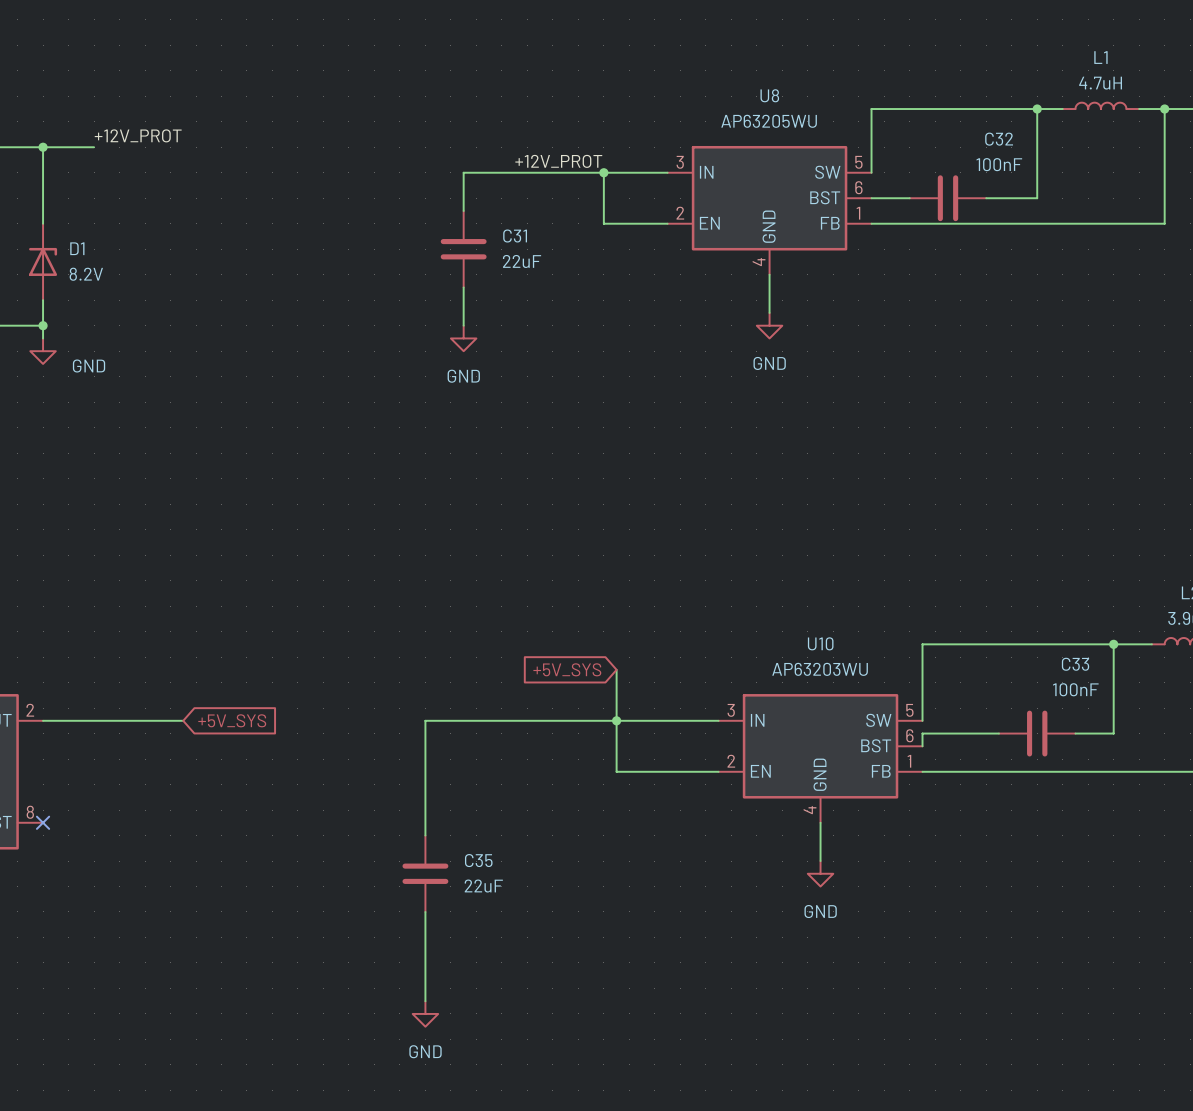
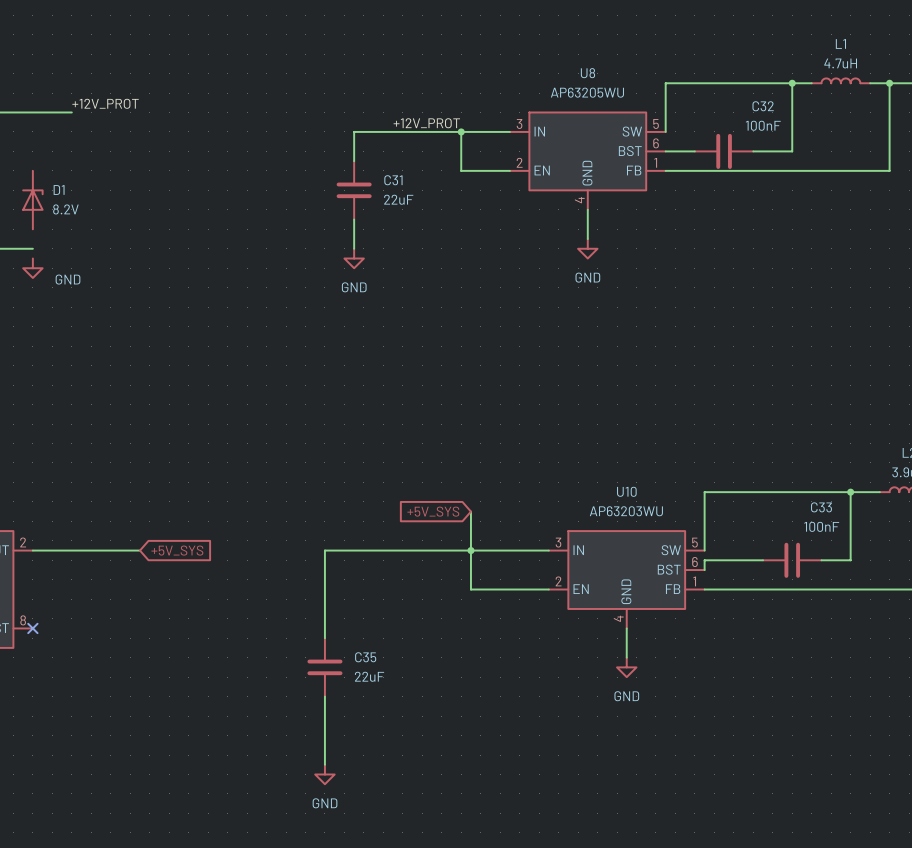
wire: (43, 147) (43, 223) -> none
junction: (43, 147) -> none
wire: (43, 300) (43, 338) -> none
junction: (43, 325) -> none

